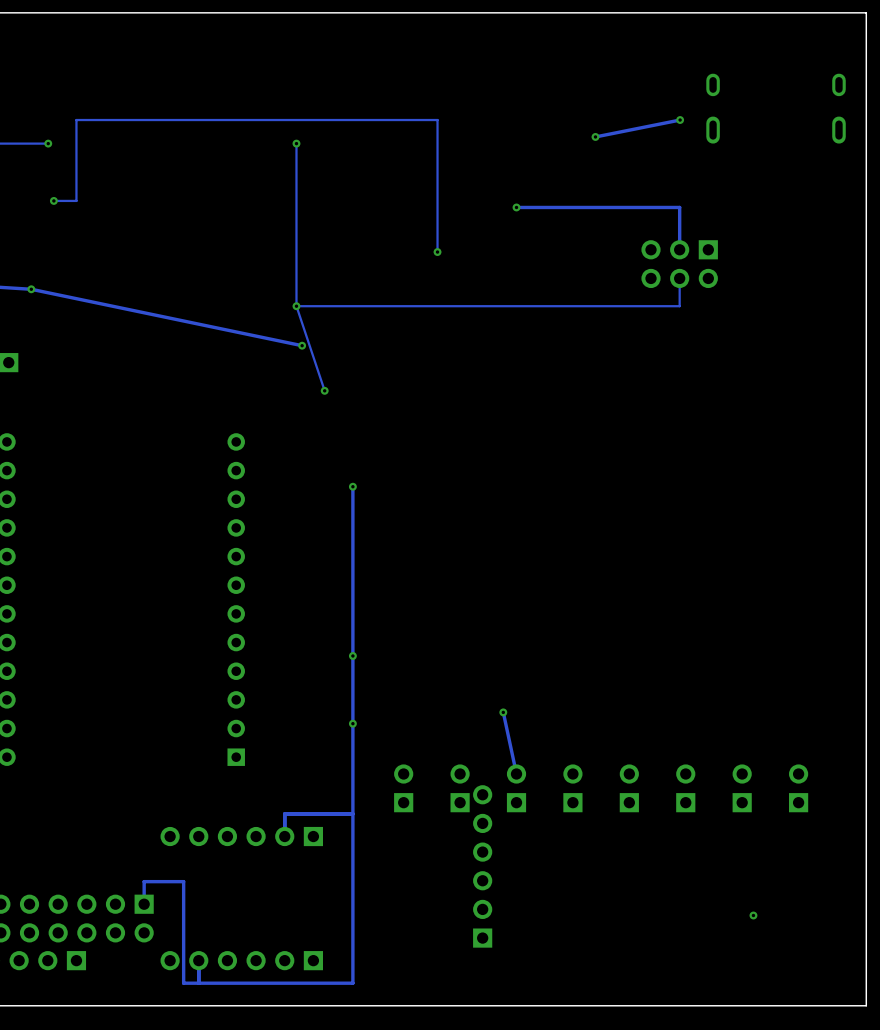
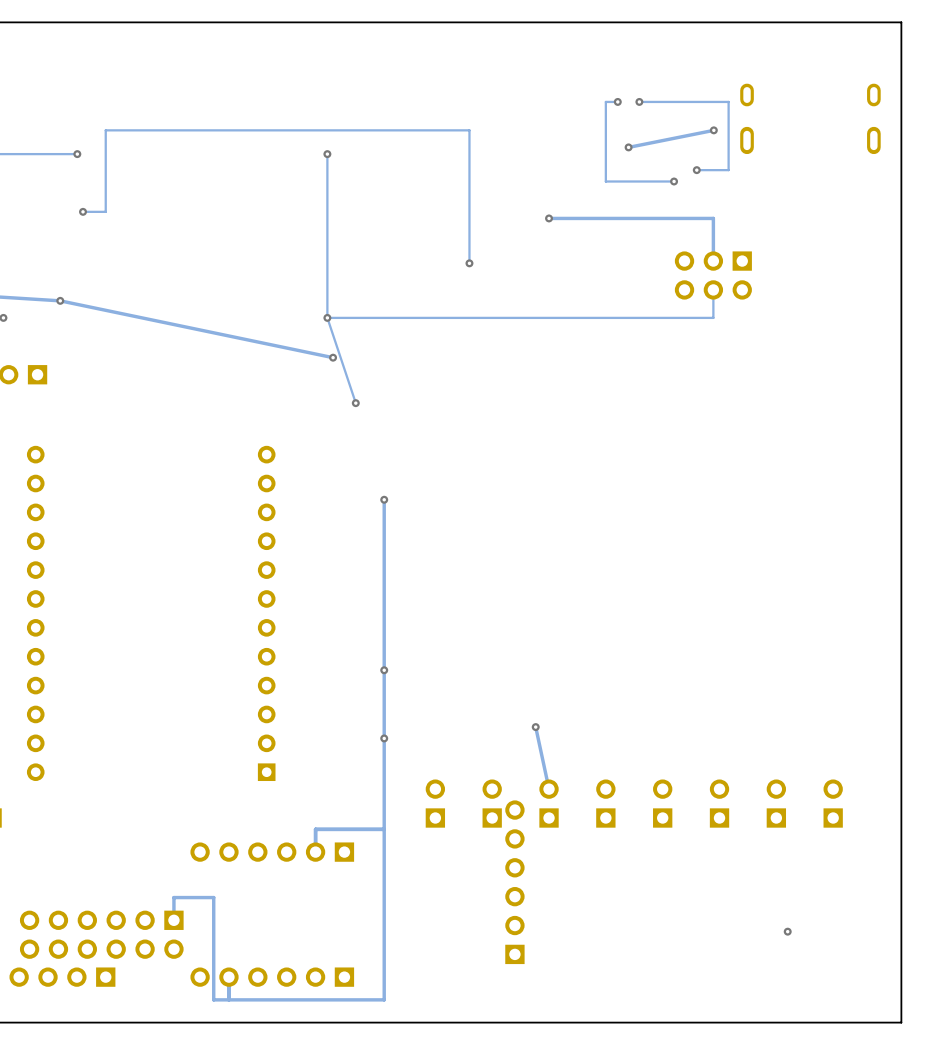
track: none -> (617, 101) (605, 101) (605, 181) (674, 181)
via: none -> (617, 101)
track: none -> (639, 101) (728, 101) (728, 170) (696, 170)
via: none -> (639, 101)
via: none -> (696, 170)
via: none -> (674, 181)

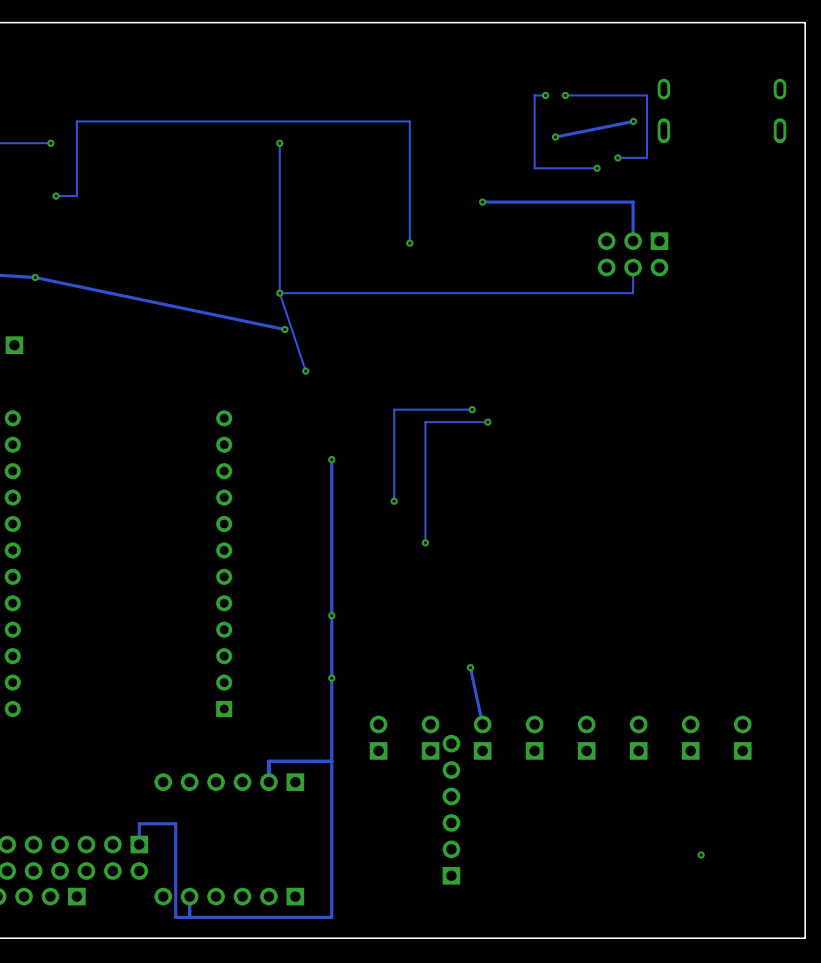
track: none -> (472, 409) (394, 409) (394, 501)
via: none -> (472, 409)
track: none -> (487, 422) (425, 422) (425, 542)
via: none -> (487, 422)
via: none -> (394, 501)
via: none -> (425, 542)

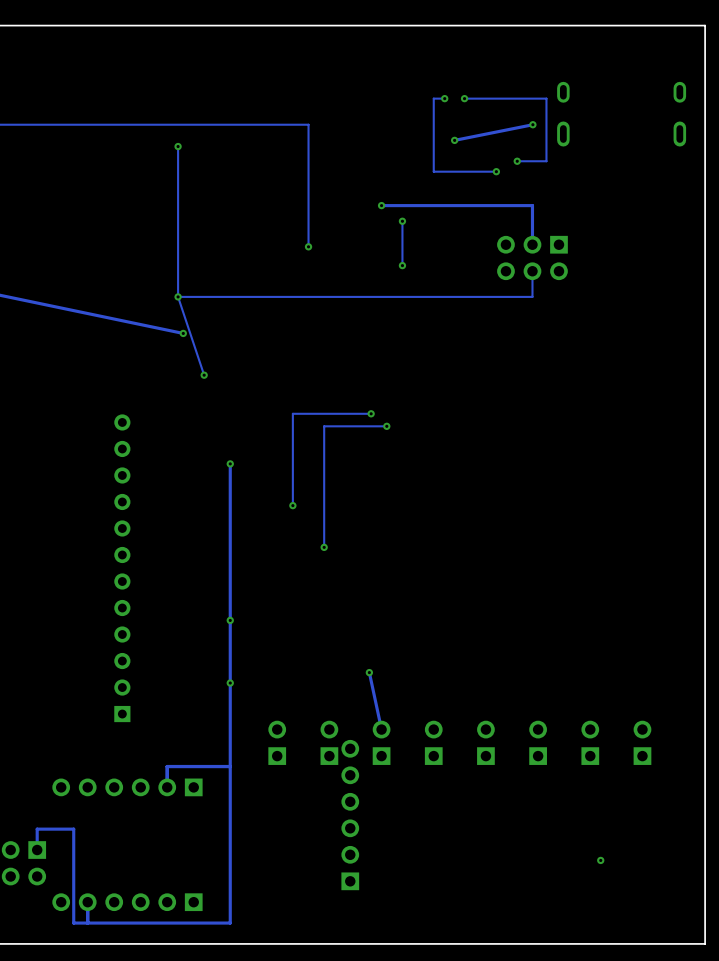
track: none -> (402, 221) (402, 265)
via: none -> (402, 221)
via: none -> (402, 265)

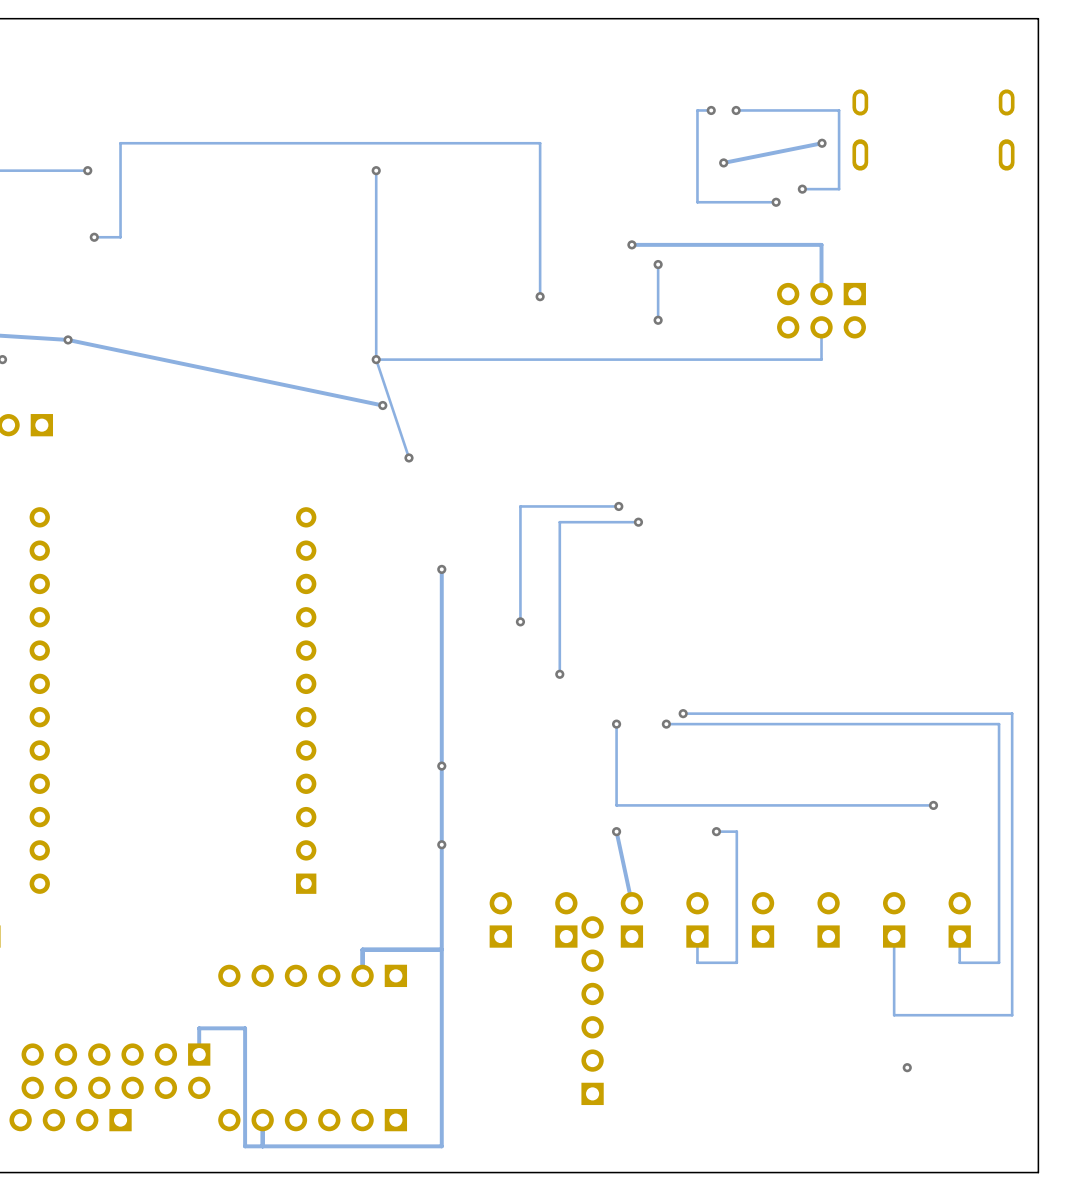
track: none -> (683, 713) (1012, 713) (1012, 1015) (894, 1015) (894, 936)
via: none -> (683, 713)
track: none -> (616, 724) (616, 805) (933, 805)
via: none -> (616, 724)
track: none -> (666, 724) (999, 724) (999, 962) (959, 962) (959, 936)
via: none -> (666, 724)
via: none -> (933, 805)
track: none -> (716, 831) (736, 831) (736, 962) (697, 962) (697, 936)
via: none -> (716, 831)

